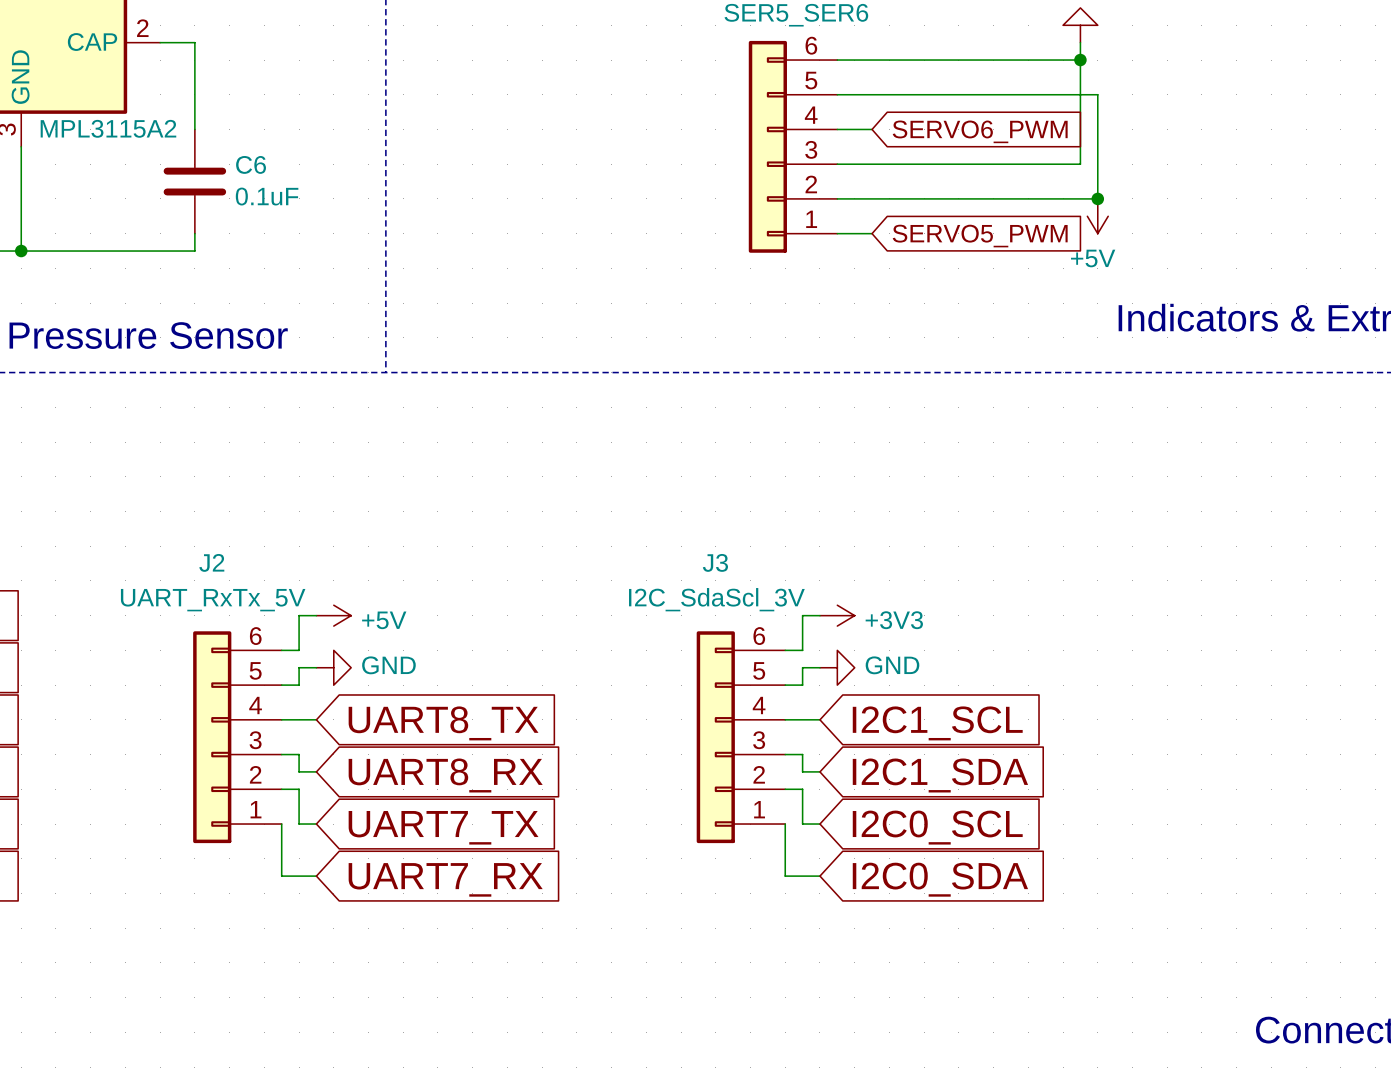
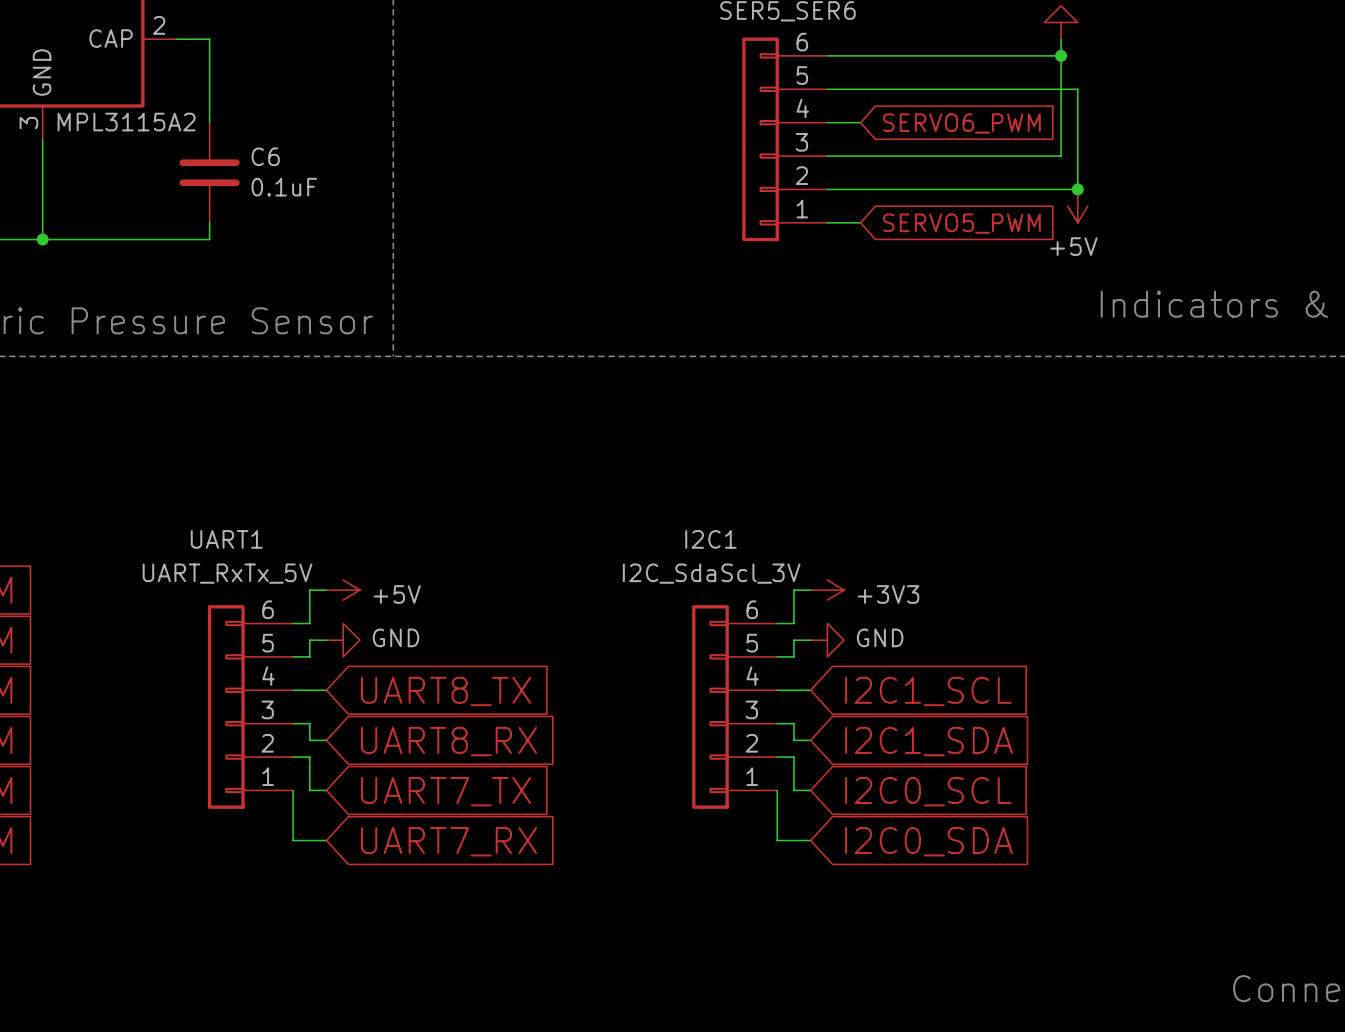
J2 name: J2 (211, 562) -> UART1 (226, 539)
J3 name: J3 (715, 562) -> I2C1 (710, 539)

